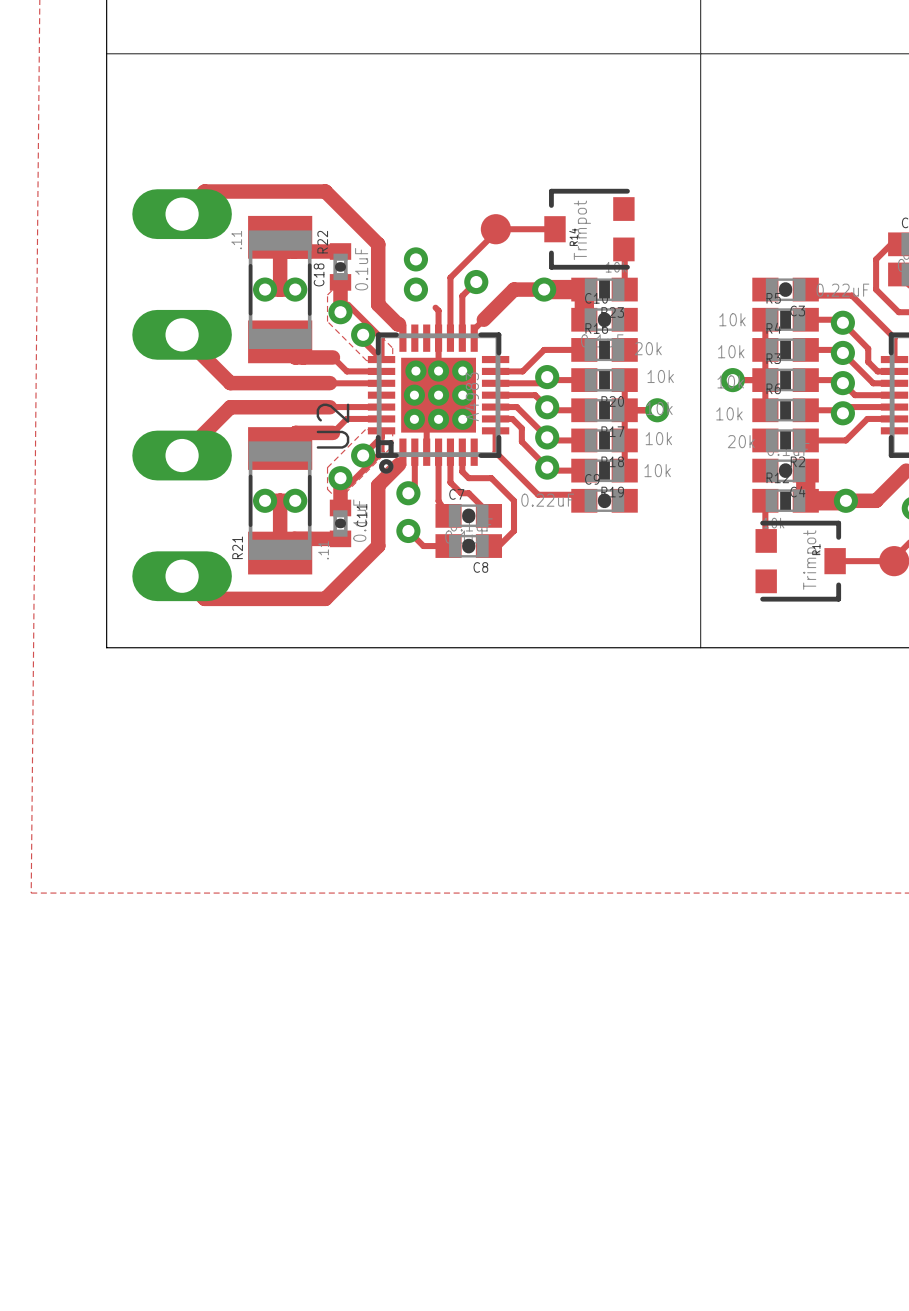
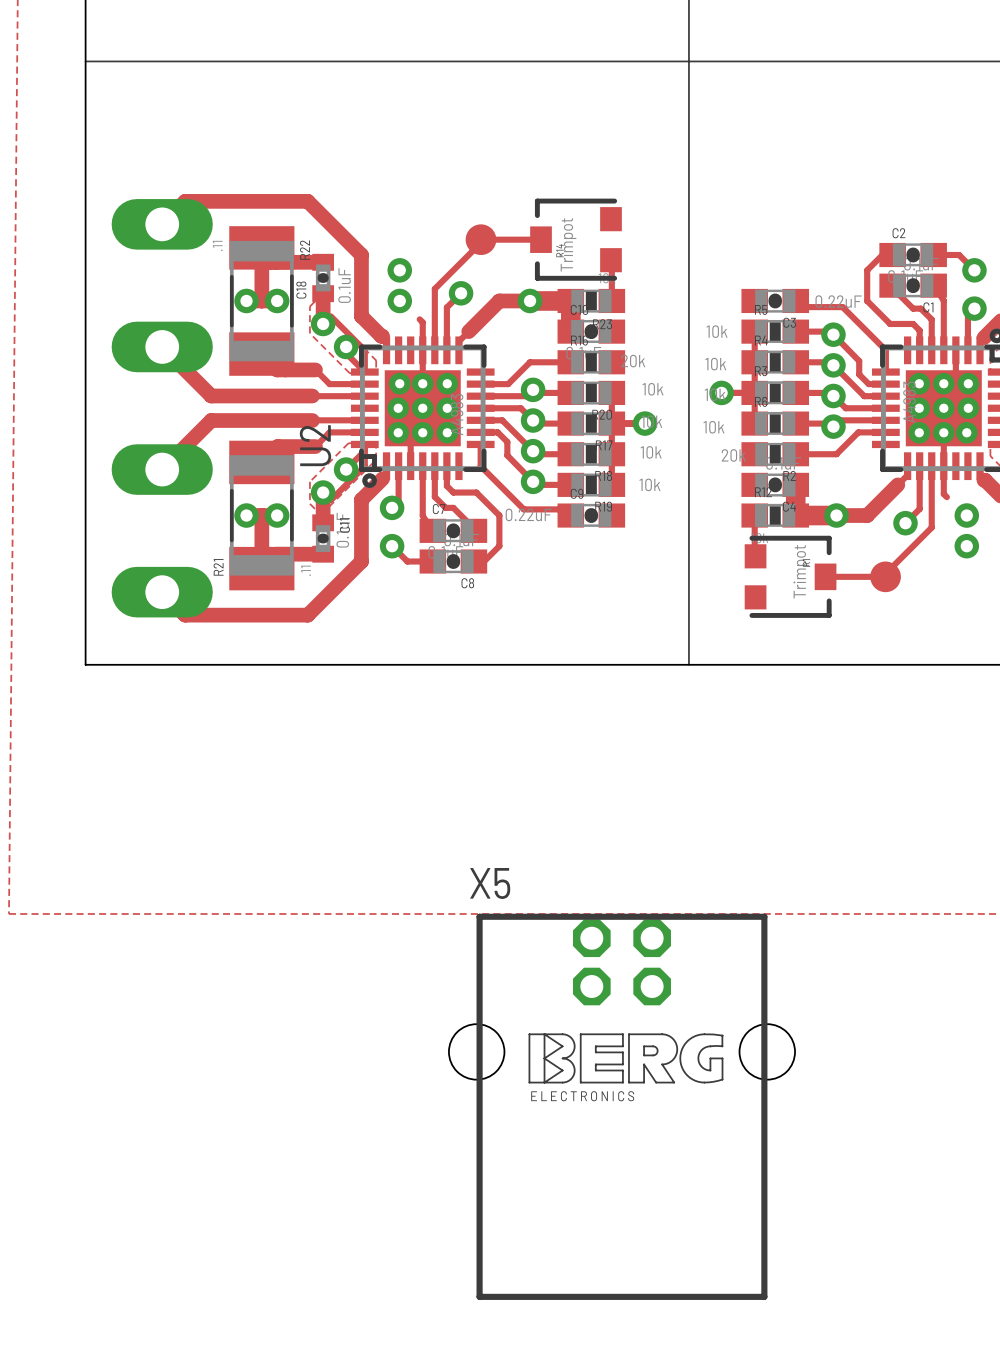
X5: none -> (621, 1106)

